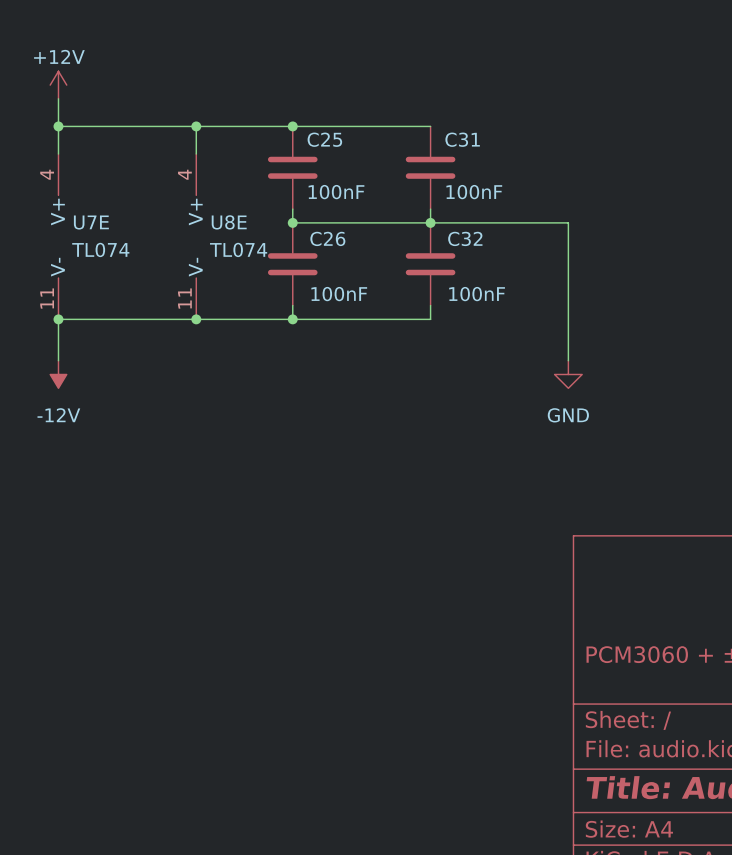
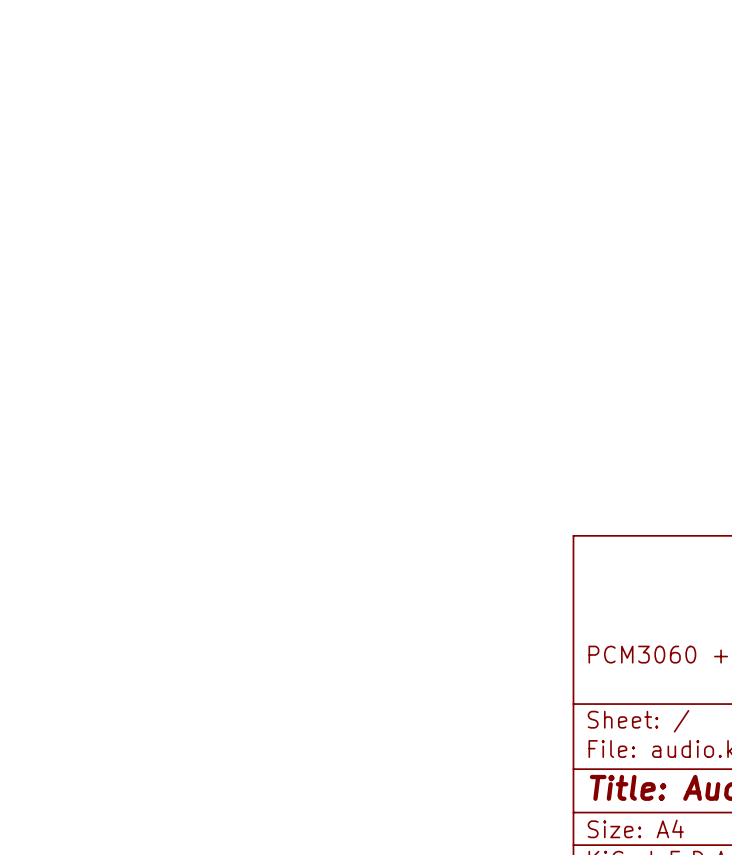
power symbol: +12V (58, 85) -> none
wire: (58, 98) (58, 154) -> none
wire: (58, 126) (430, 126) -> none
junction: (58, 126) -> none
wire: (196, 126) (196, 154) -> none
junction: (196, 126) -> none
junction: (292, 126) -> none
C25: 100nF (292, 167) -> none
C31: 100nF (430, 167) -> none
wire: (292, 209) (292, 222) (568, 222) (568, 360) -> none
wire: (430, 209) (430, 222) -> none
junction: (292, 222) -> none
junction: (430, 222) -> none
U7E: TL074 (58, 236) -> none
U8E: TL074 (196, 236) -> none
C26: 100nF (292, 264) -> none
C32: 100nF (430, 264) -> none
wire: (292, 305) (292, 319) -> none
wire: (430, 305) (430, 319) (58, 319) (58, 360) -> none
junction: (58, 319) -> none
junction: (196, 319) -> none
junction: (292, 319) -> none
power symbol: -12V (58, 374) -> none
power symbol: GND (568, 374) -> none

